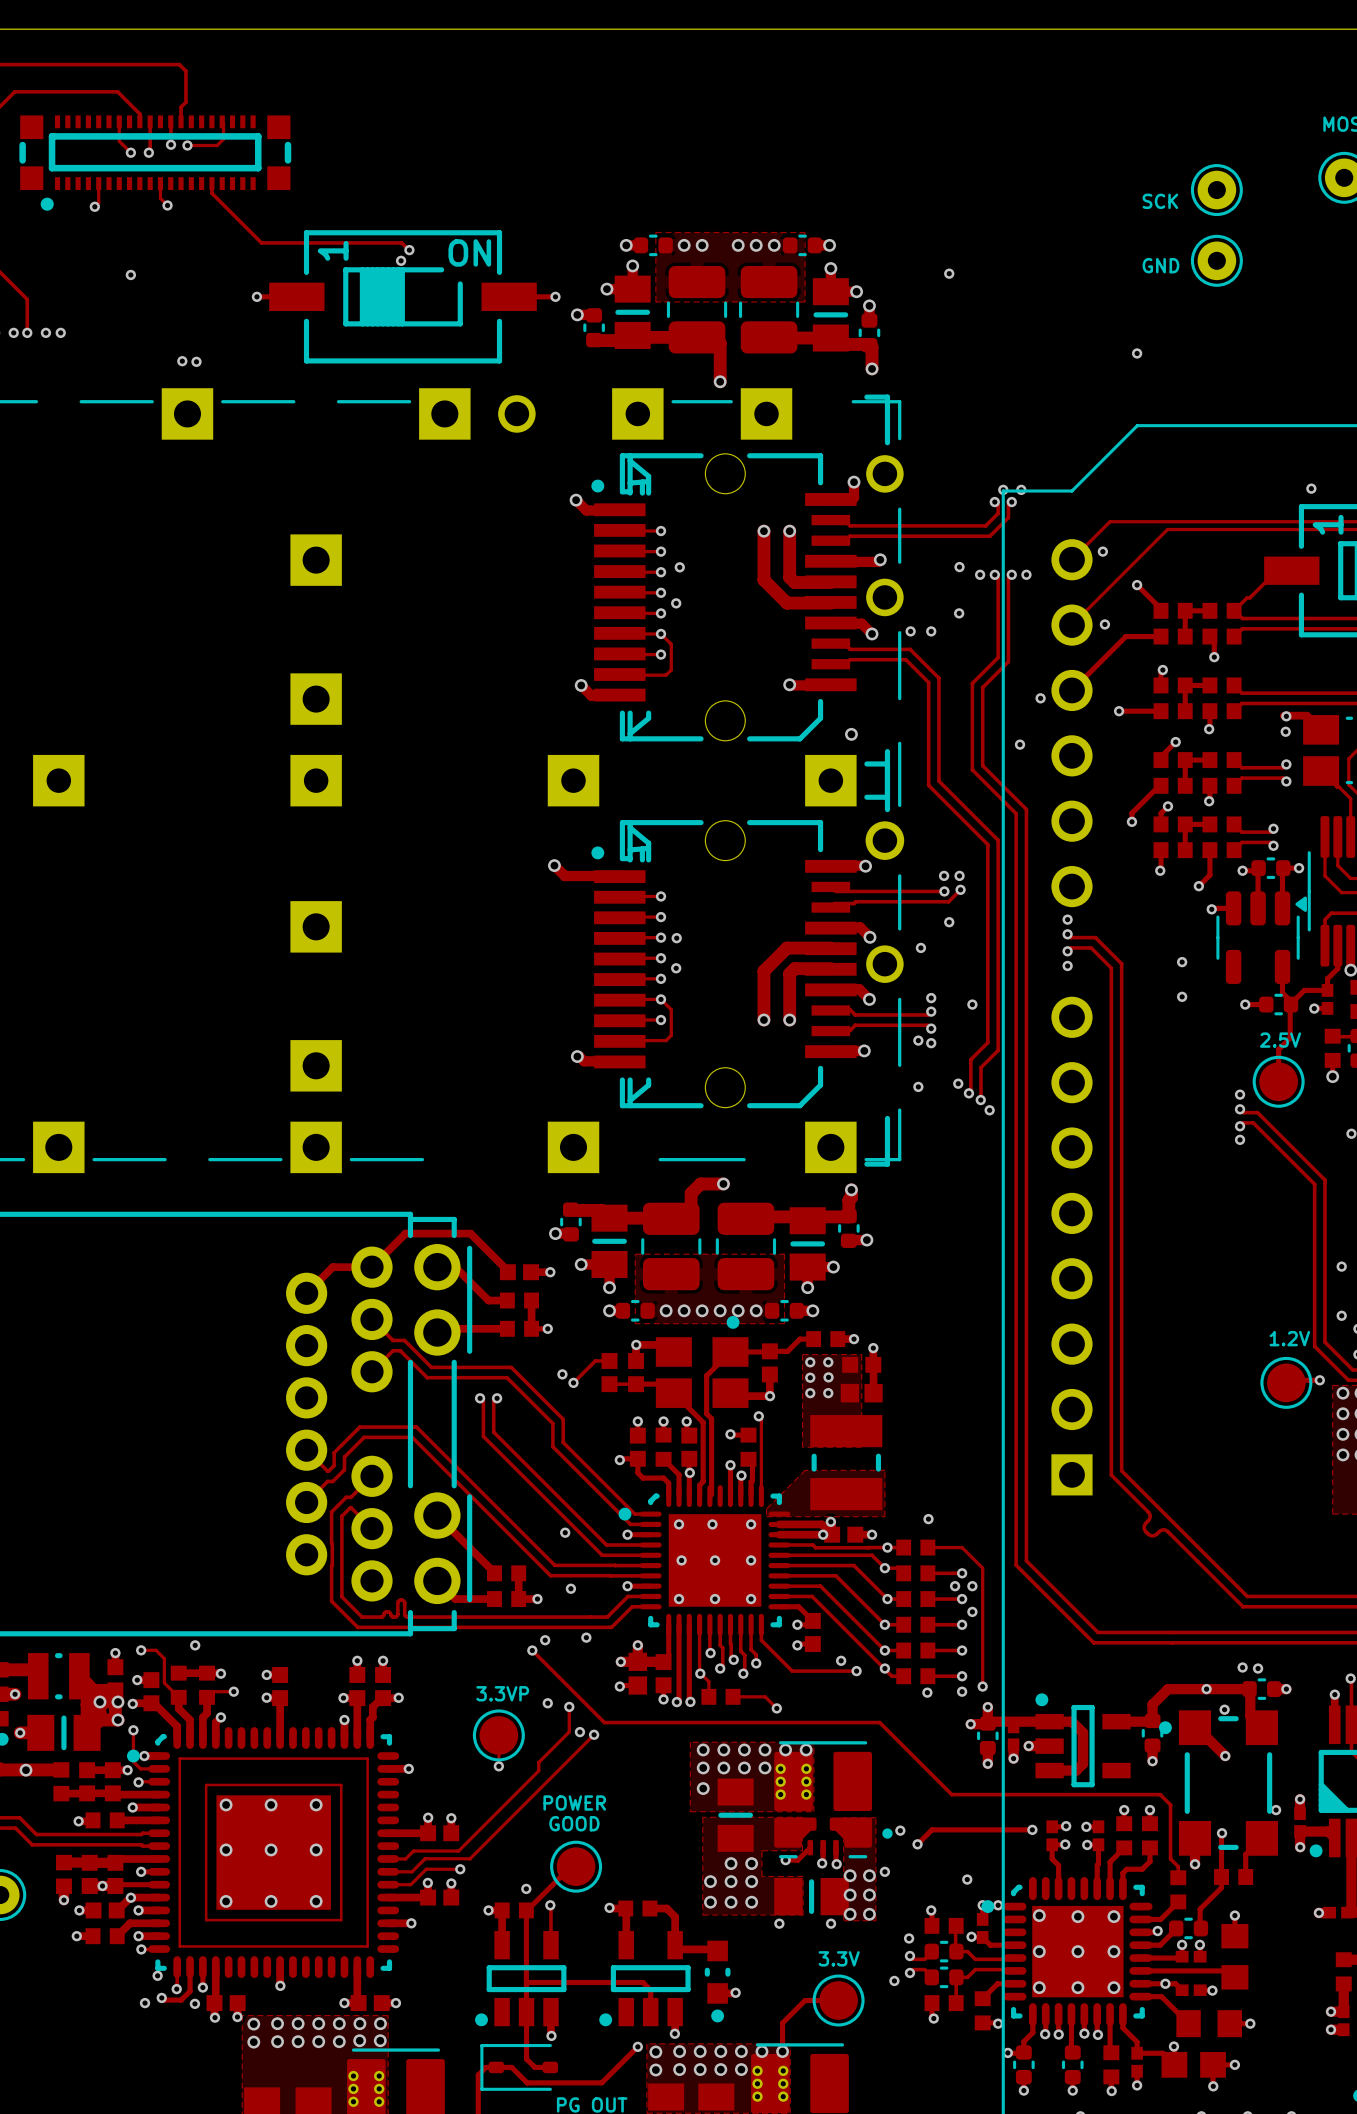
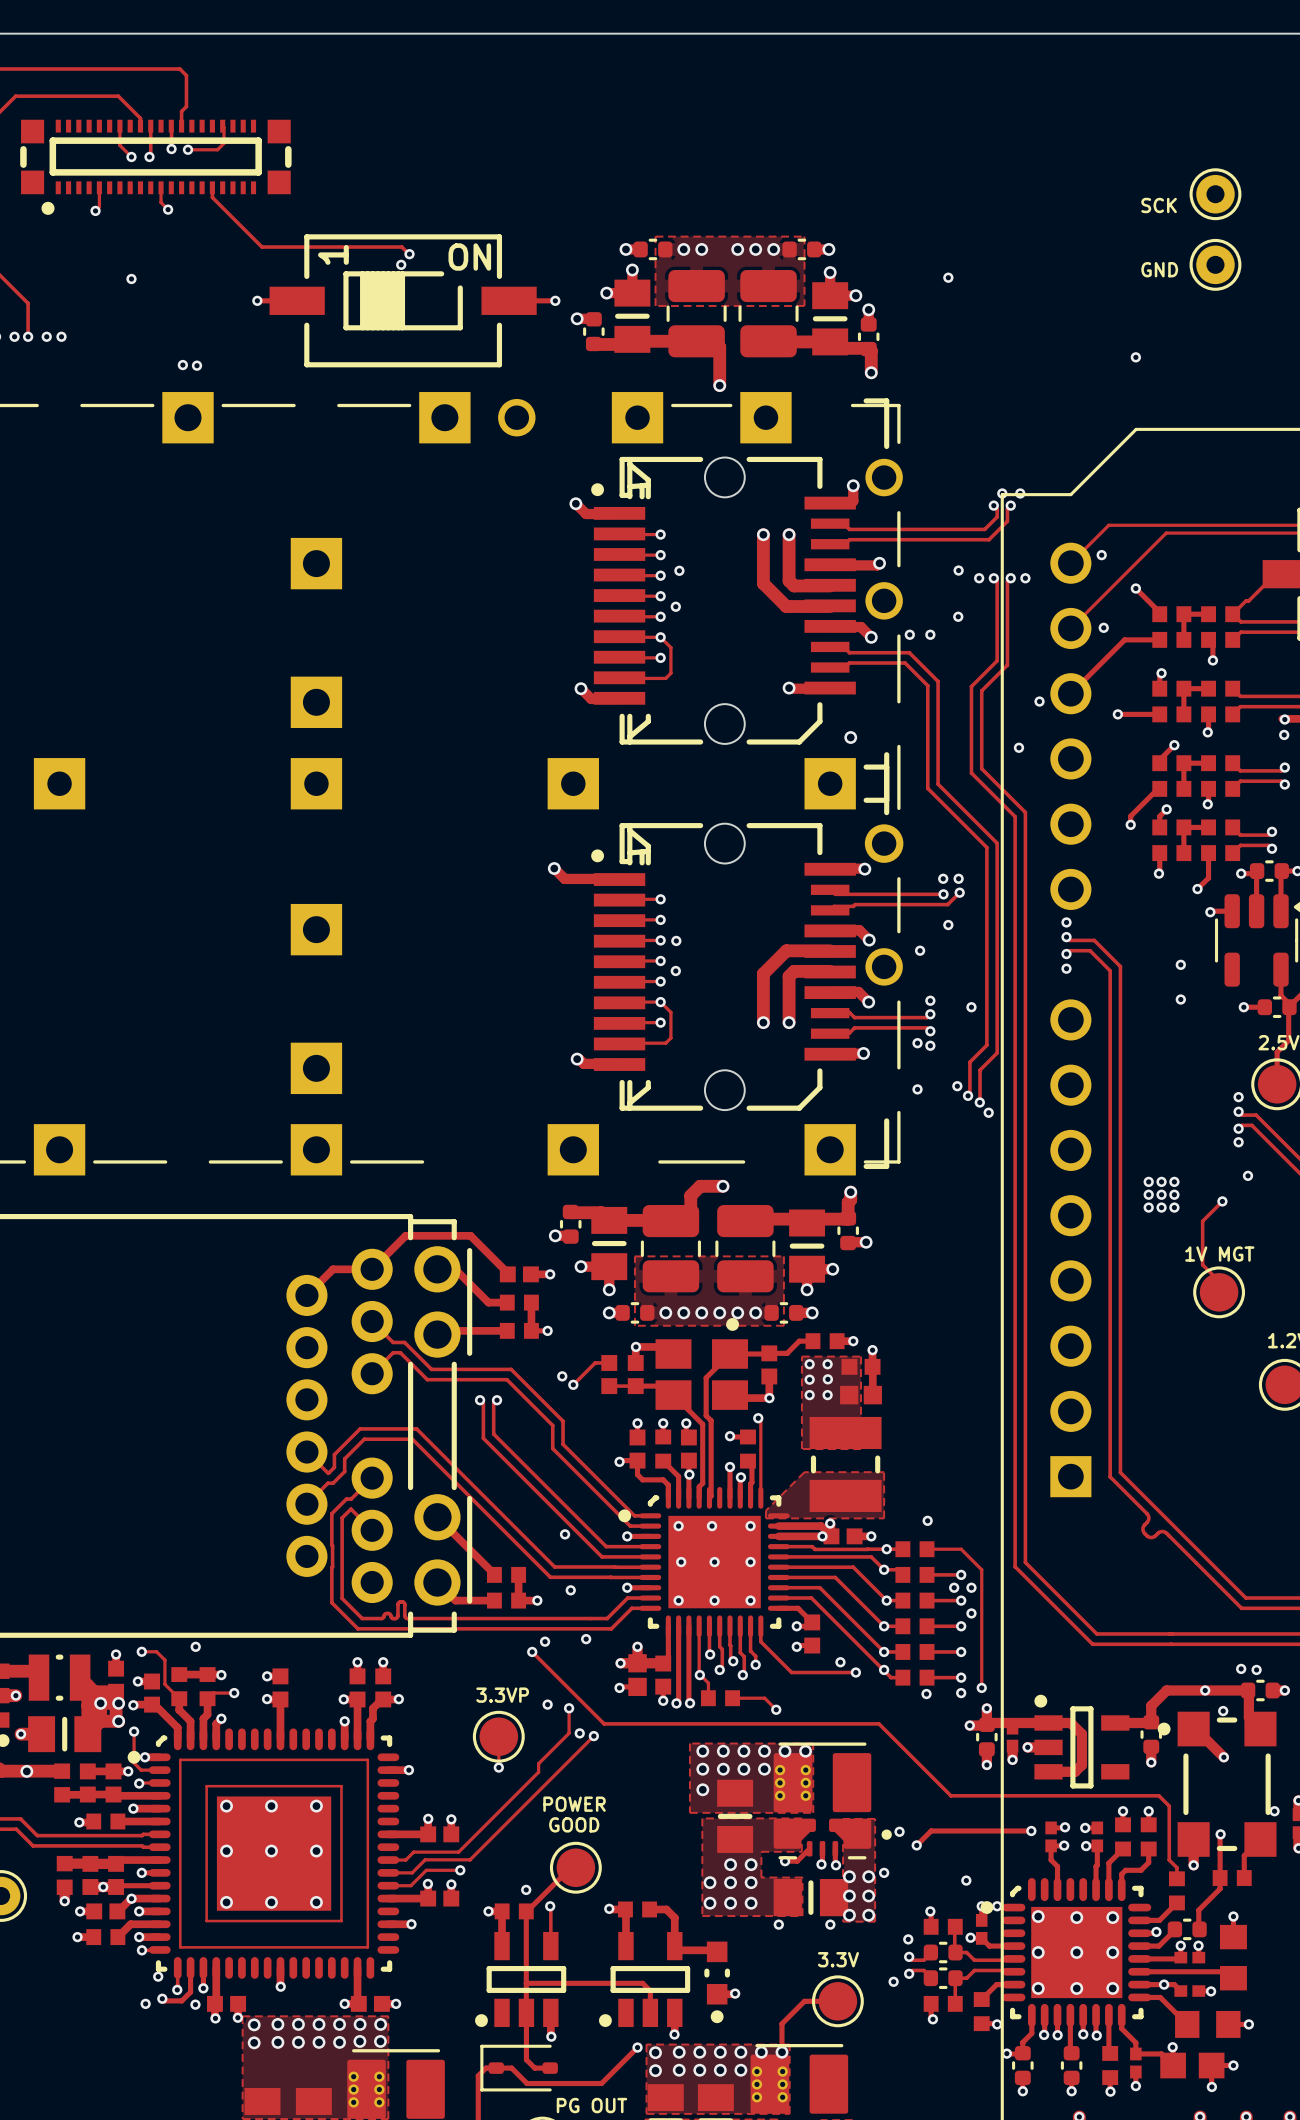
via: none -> (1247, 1175)
via: none -> (1148, 1181)
via: none -> (1161, 1181)
via: none -> (1174, 1181)
via: none -> (1148, 1194)
via: none -> (1161, 1194)
via: none -> (1174, 1194)
track: none -> (1222, 1201) (1202, 1221) (1202, 1264) (1218, 1280)
via: none -> (1222, 1201)
via: none -> (1148, 1207)
via: none -> (1161, 1207)
via: none -> (1174, 1207)
text: none -> 1V MGT (1219, 1254)
part: none -> (1219, 1292)

